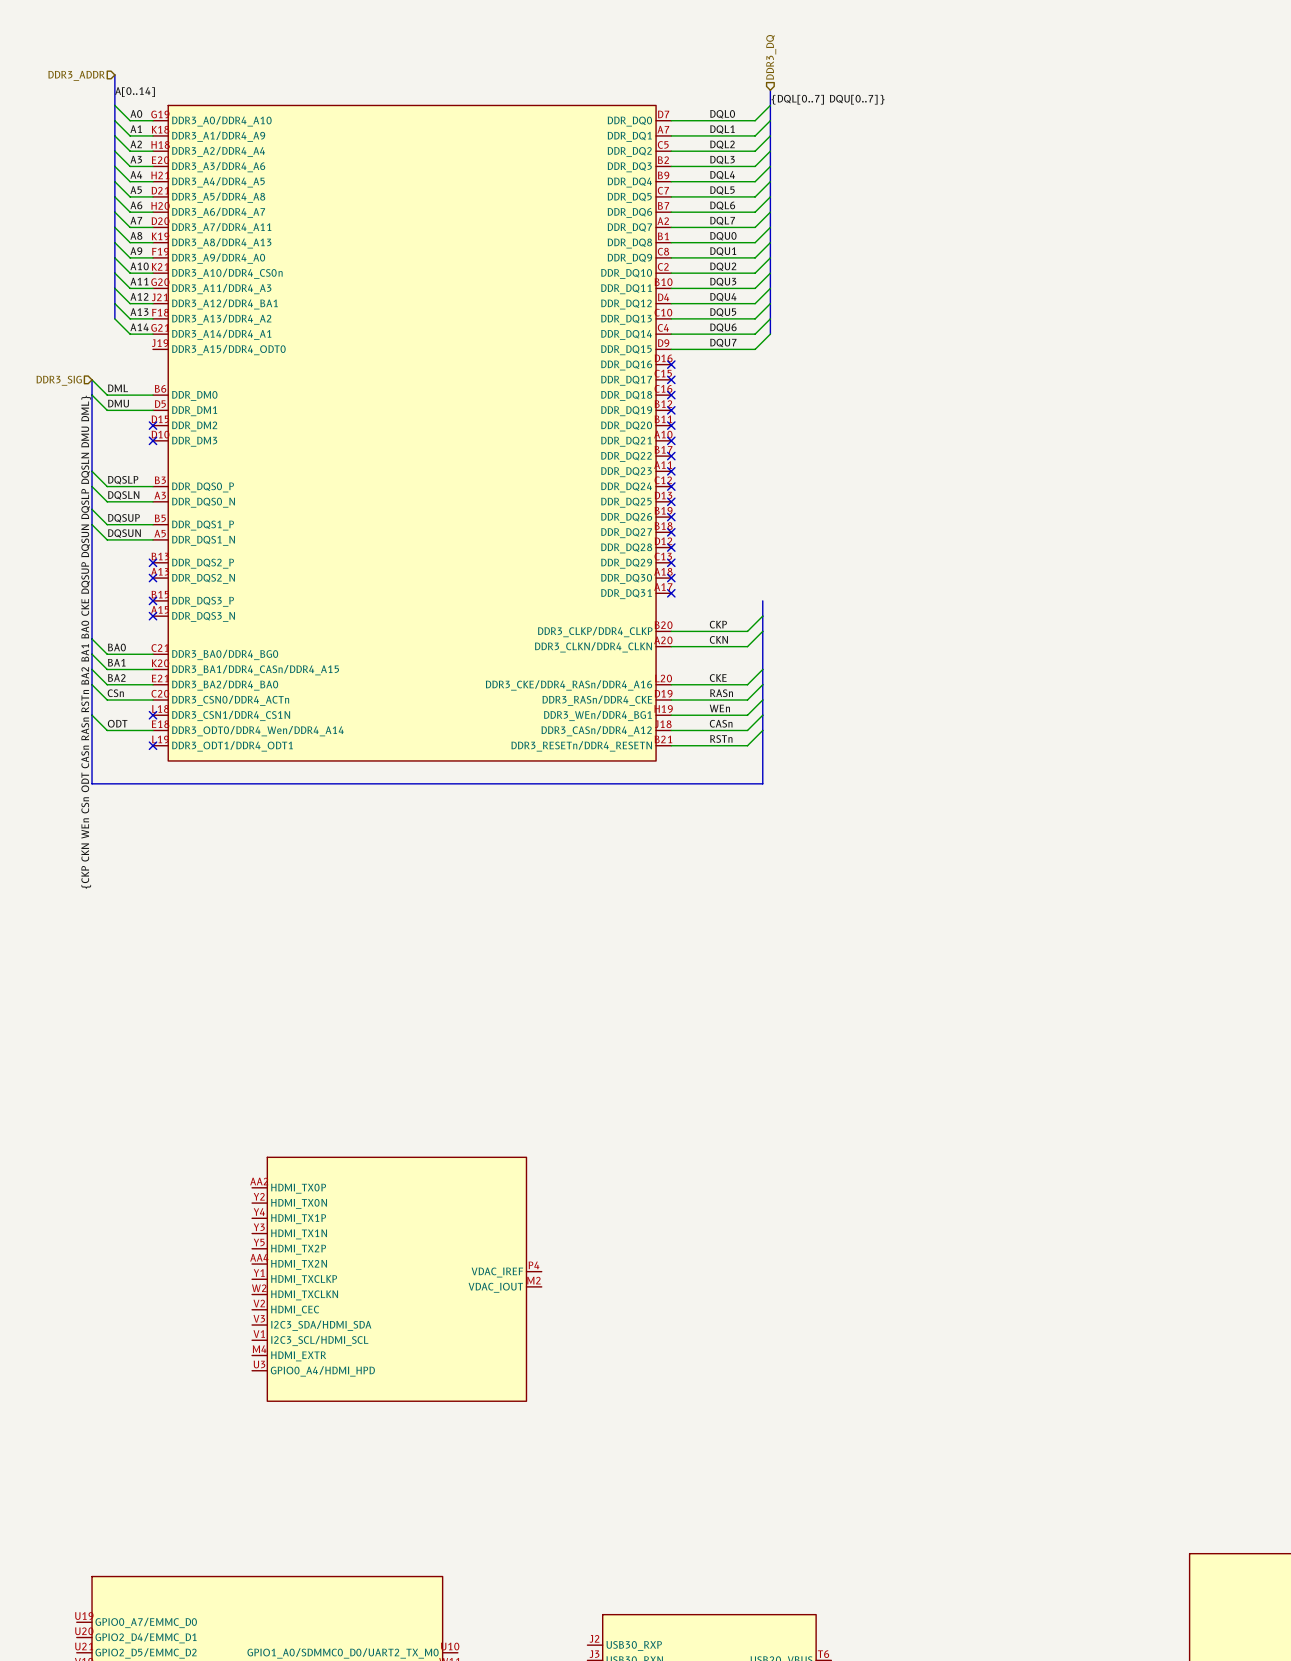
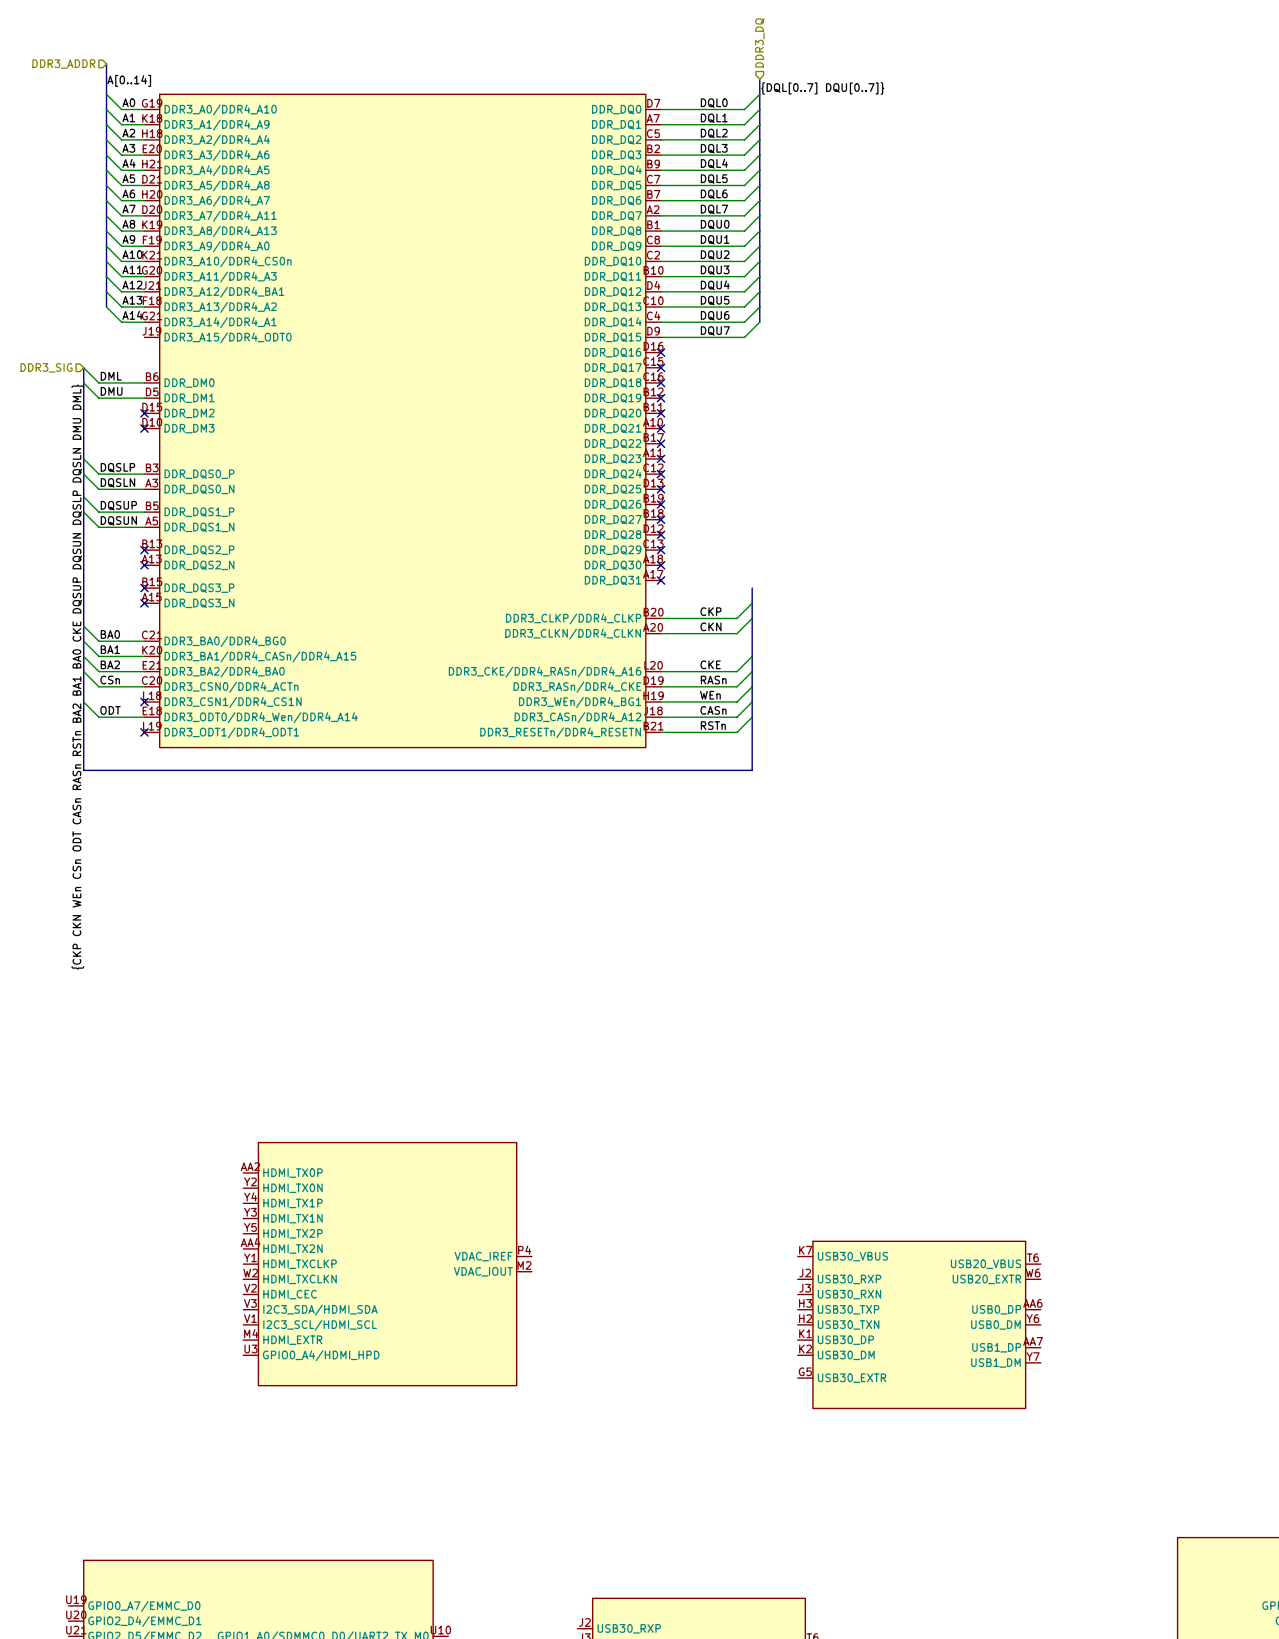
part: none -> (919, 1324)

